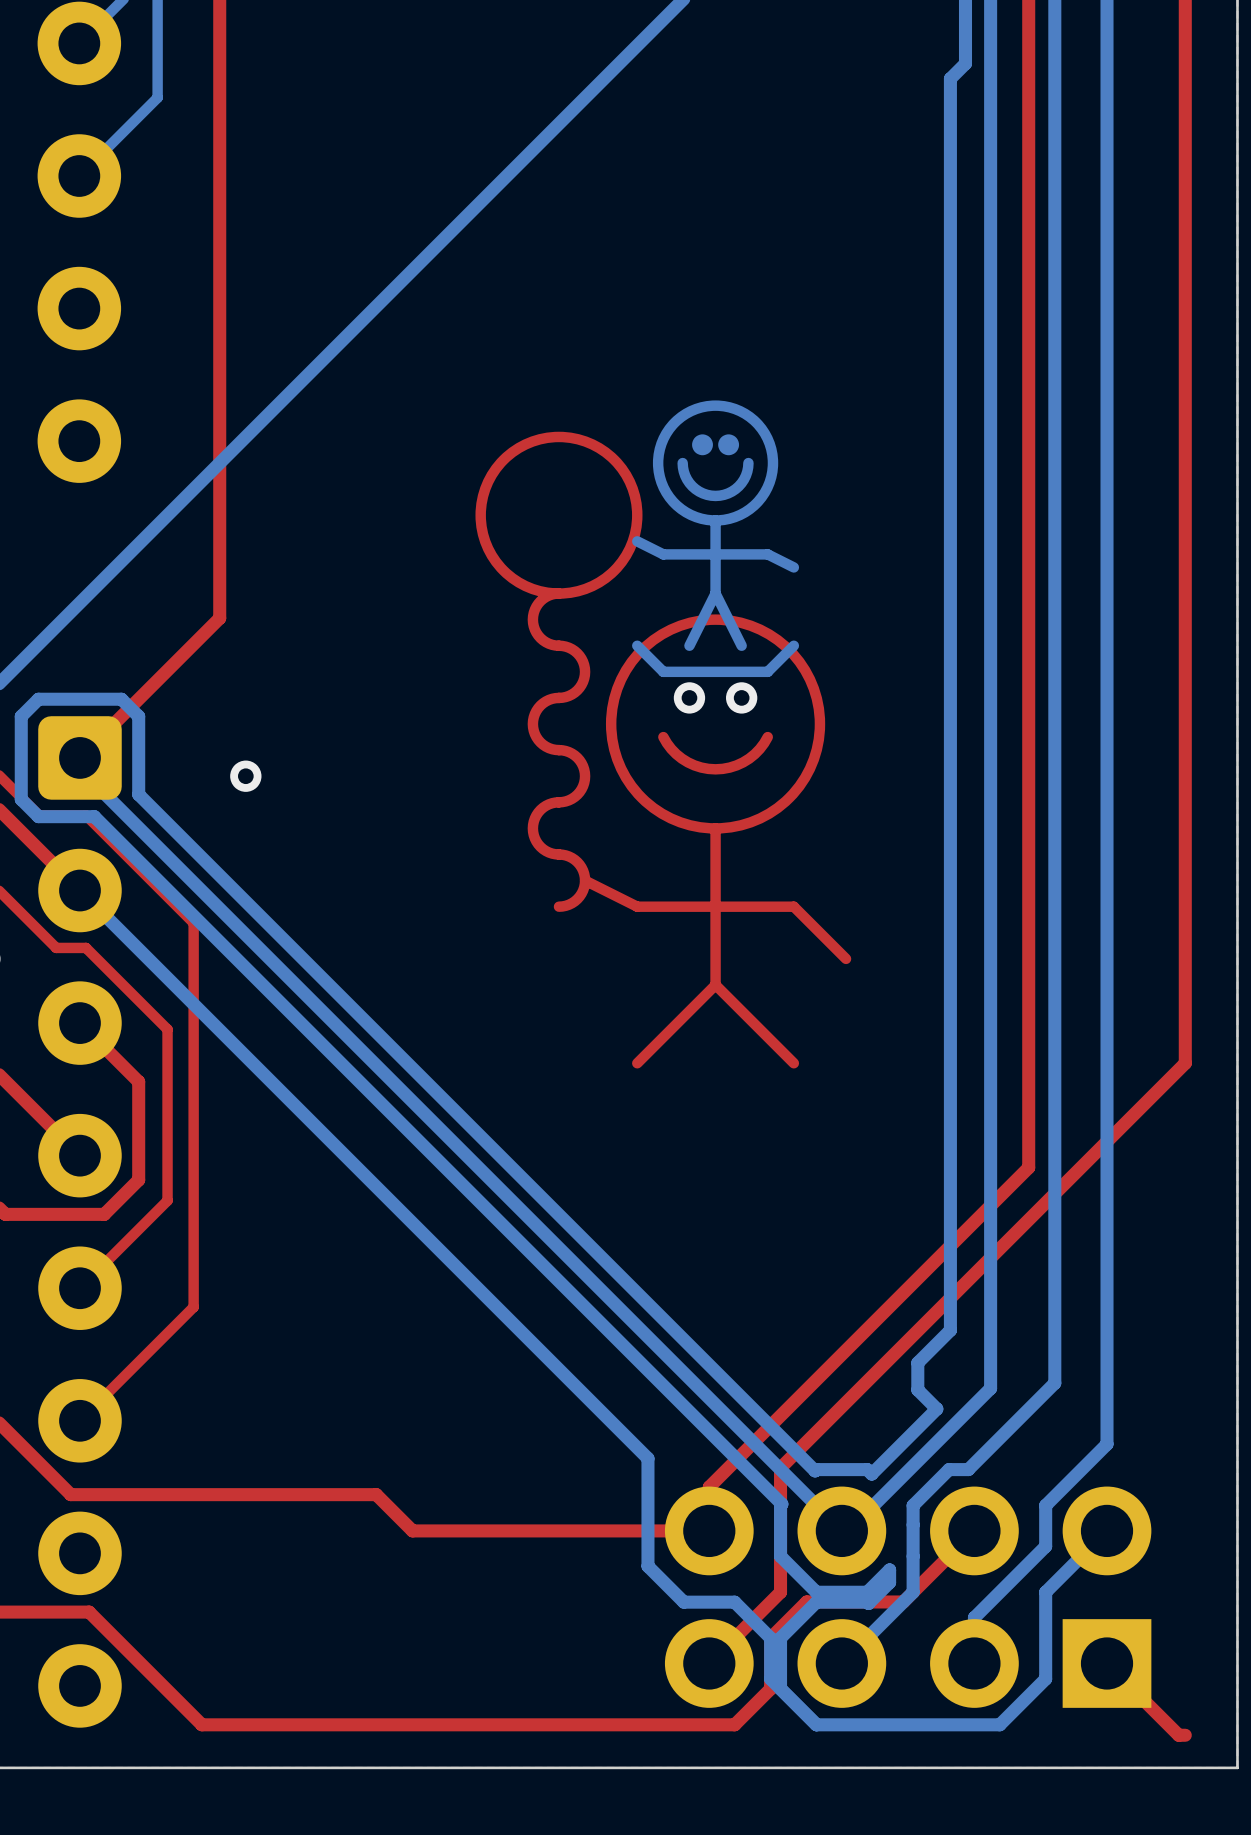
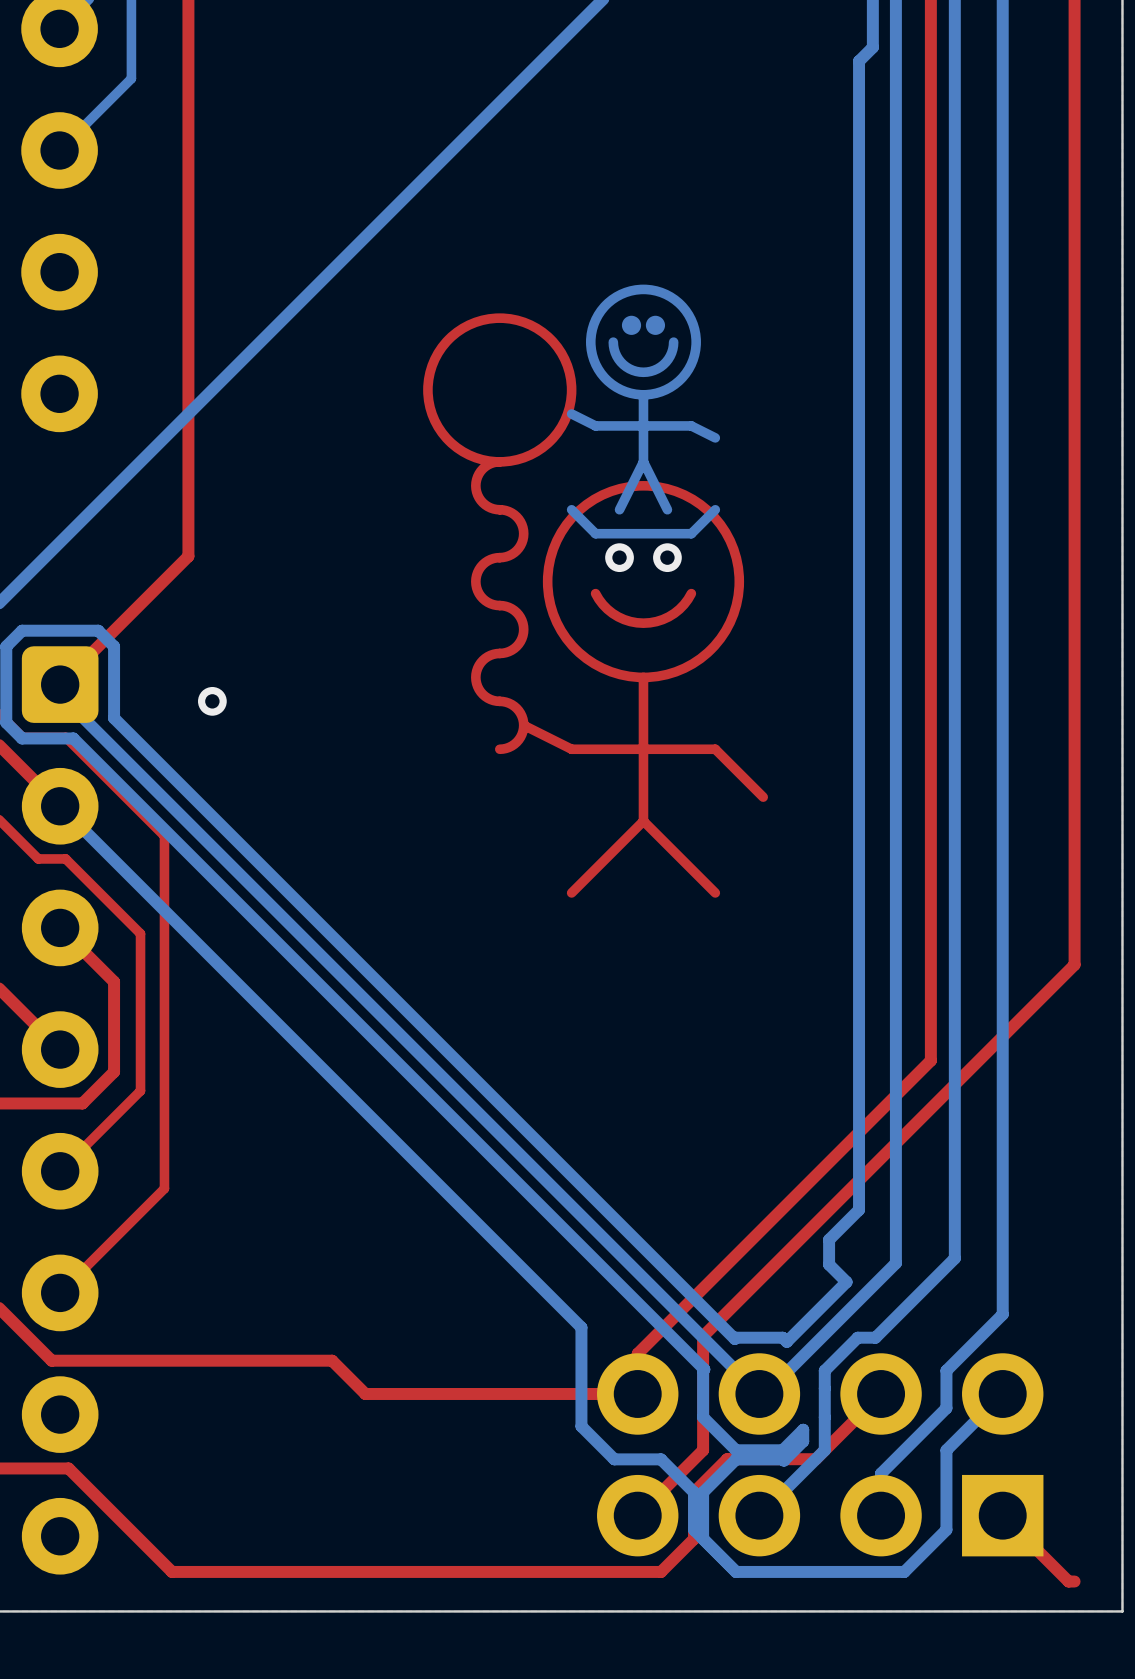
drawing: none -> [621, 315, 666, 335]
bottom track: none -> (673, 342) (671, 352) (666, 362) (657, 368) (643, 372) (632, 370) (623, 364) (616, 356) (613, 342)
drawing: [692, 434, 740, 456] -> none
bottom track: none -> (571, 413) (595, 425) (691, 425) (715, 437)
drawing position: (715, 463) -> (643, 342)
bottom track: (748, 463) (745, 475) (738, 486) (728, 493) (715, 495) (702, 493) (692, 486) (685, 475) (682, 463) -> none
drawing position: (558, 515) -> (499, 390)
bottom track: (715, 520) (715, 593) -> (643, 394) (643, 461)
bottom track: (637, 541) (663, 554) (767, 554) (793, 567) -> (571, 509) (595, 533) (691, 533) (715, 509)
top track: (558, 593) (548, 595) (540, 601) (534, 609) (532, 619) (534, 629) (540, 638) (548, 643) (565, 646) (574, 651) (581, 658) (584, 668) (584, 678) (577, 690) (568, 695) (552, 698) (543, 703) (536, 710) (533, 720) (533, 730) (540, 742) (548, 748) (565, 751) (574, 755) (581, 763) (584, 772) (584, 782) (577, 794) (568, 800) (552, 803) (543, 807) (536, 815) (533, 825) (533, 835) (540, 846) (548, 852) (572, 858) (579, 864) (584, 873) (584, 887) (579, 896) (568, 904) (558, 906) -> (499, 461) (490, 463) (482, 468) (477, 476) (475, 485) (477, 494) (482, 502) (490, 507) (505, 510) (514, 514) (520, 521) (523, 530) (521, 542) (516, 550) (508, 555) (493, 558) (485, 562) (479, 569) (476, 578) (476, 587) (482, 598) (490, 603) (505, 606) (514, 610) (520, 617) (523, 626) (522, 635) (516, 646) (508, 651) (493, 654) (485, 658) (479, 665) (476, 674) (476, 683) (482, 694) (490, 699) (511, 704) (518, 710) (522, 719) (522, 731) (518, 739) (508, 747) (499, 749)
bottom track: (715, 593) (741, 645) -> (643, 461) (667, 509)
bottom track: (715, 593) (689, 645) -> (643, 461) (619, 509)
via: none -> (619, 557)
via: none -> (667, 557)
bottom track: (793, 645) (767, 671) (663, 671) (637, 645) -> none
via: (689, 697) -> none
via: (741, 697) -> none
drawing position: (715, 724) -> (643, 581)
top track: (767, 737) (754, 754) (743, 762) (729, 767) (715, 769) (694, 765) (681, 758) (671, 749) (663, 737) -> (691, 593) (679, 609) (668, 616) (656, 621) (643, 623) (630, 621) (612, 613) (602, 604) (595, 593)
top track: (585, 880) (637, 906) (793, 906) (846, 958) -> (523, 725) (571, 749) (715, 749) (763, 797)
top track: (715, 906) (715, 984) -> (643, 677) (643, 749)
top track: (715, 984) (793, 1063) -> none
top track: (715, 984) (637, 1063) -> none
top track: none -> (715, 892) (643, 821) (571, 892)

